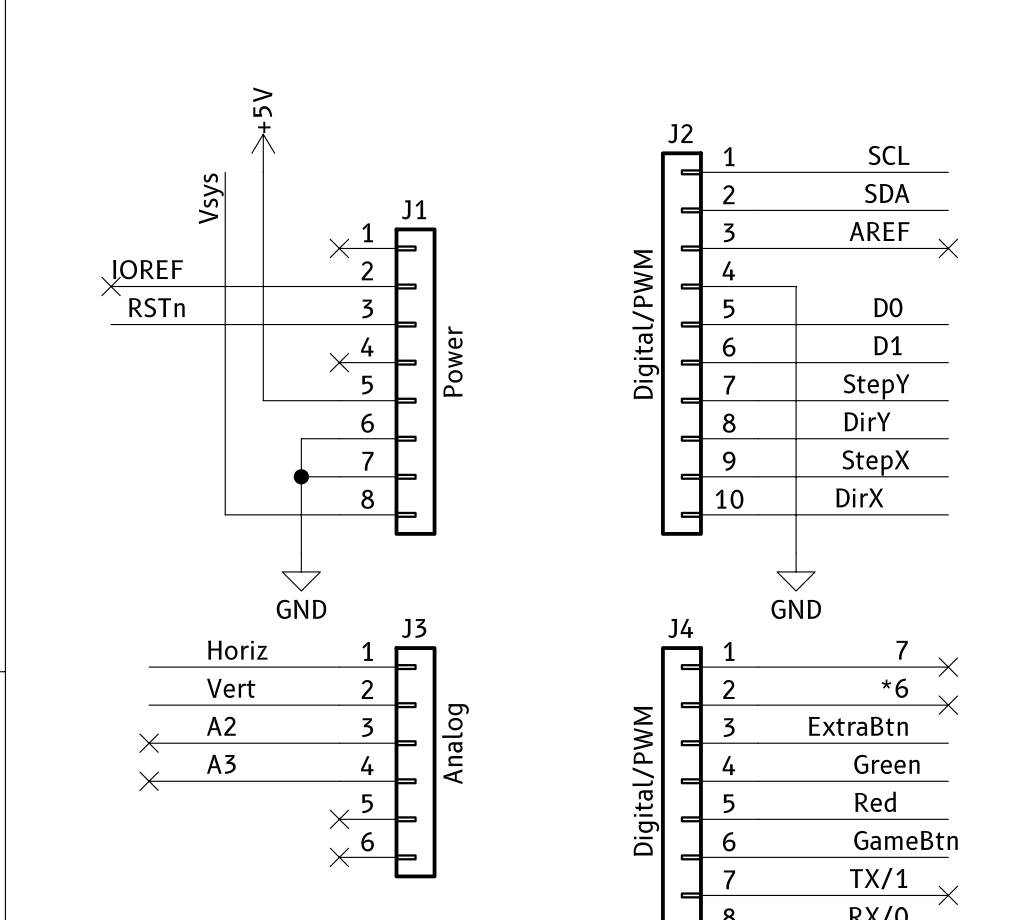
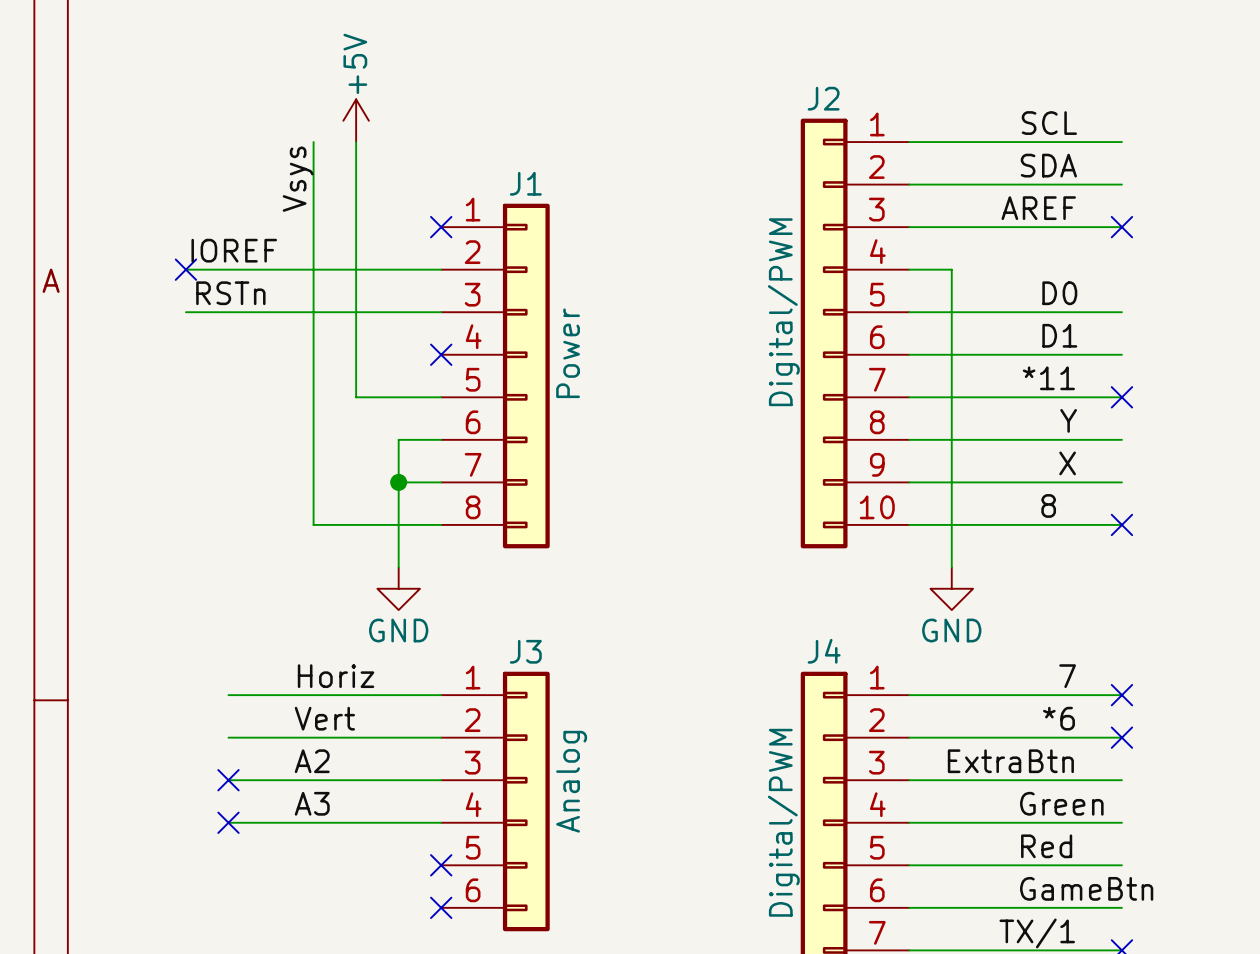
label: StepY (876, 386) -> *11 (1048, 378)
no-connect mark: none -> (1121, 397)
label: DirY (867, 421) -> none
label: none -> Y (1068, 420)
label: StepX (875, 462) -> X (1067, 463)
label: DirX (859, 497) -> none
label: none -> 8 (1048, 505)
no-connect mark: none -> (1121, 524)

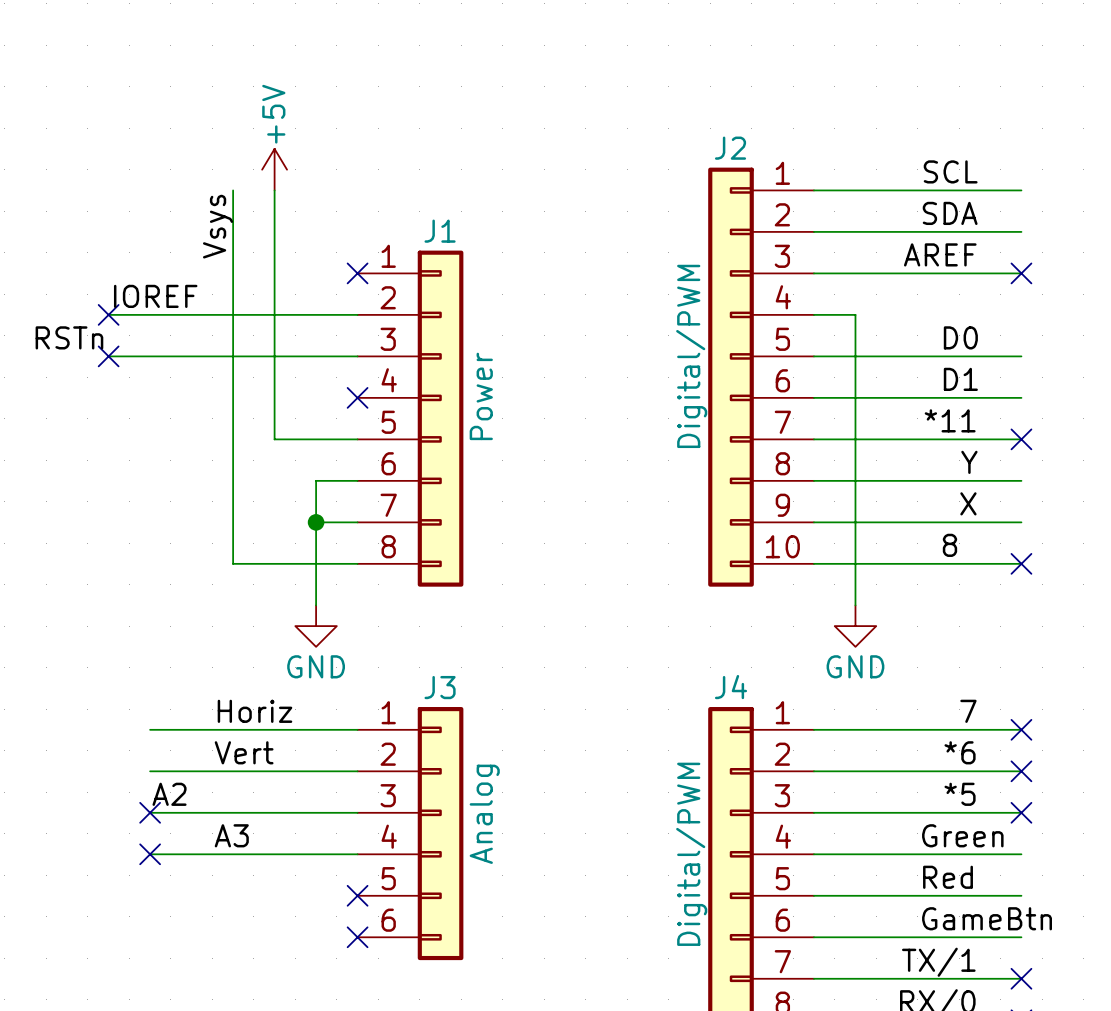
label position: RSTn (230, 293) -> RSTn (69, 337)
no-connect mark: none -> (108, 356)
label position: A2 (312, 761) -> A2 (169, 794)
label: ExtraBtn (1010, 761) -> *5 (960, 794)
no-connect mark: none -> (1021, 812)

